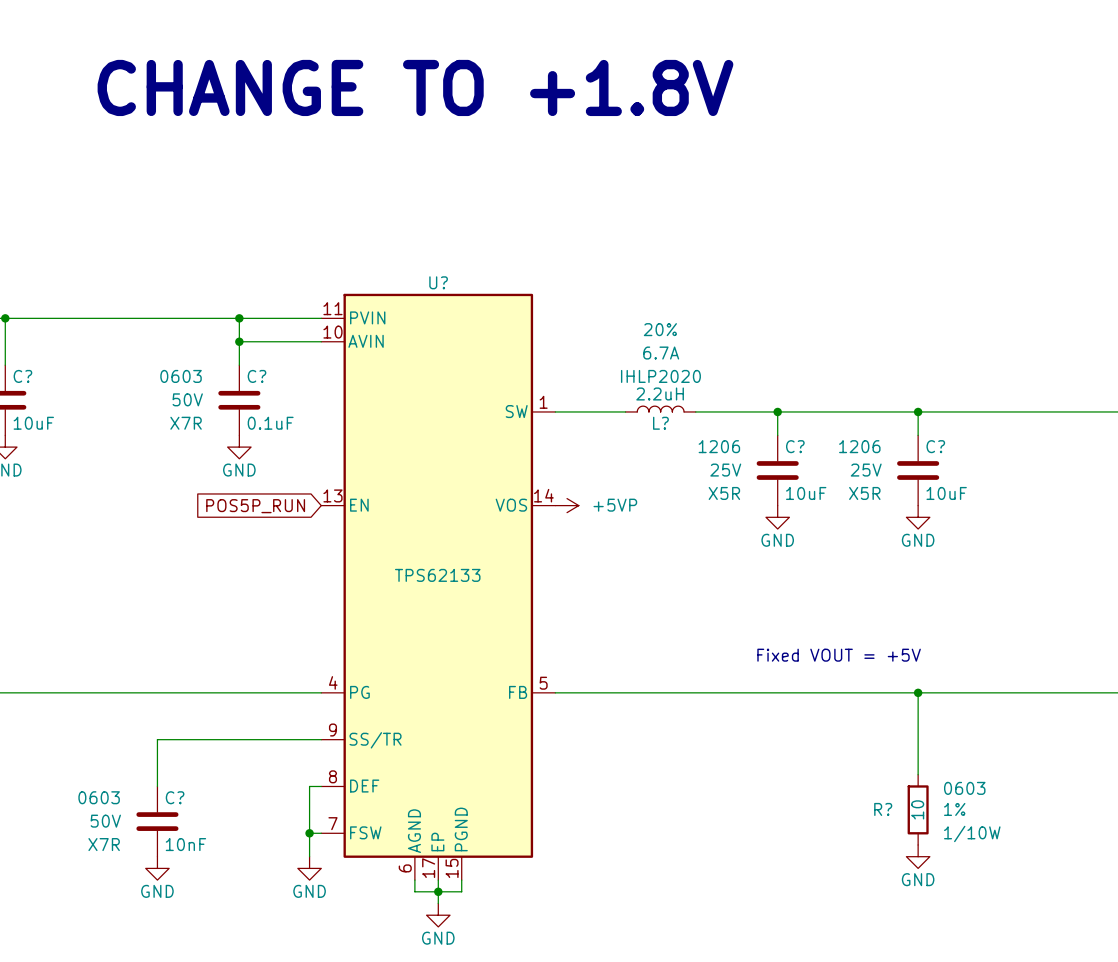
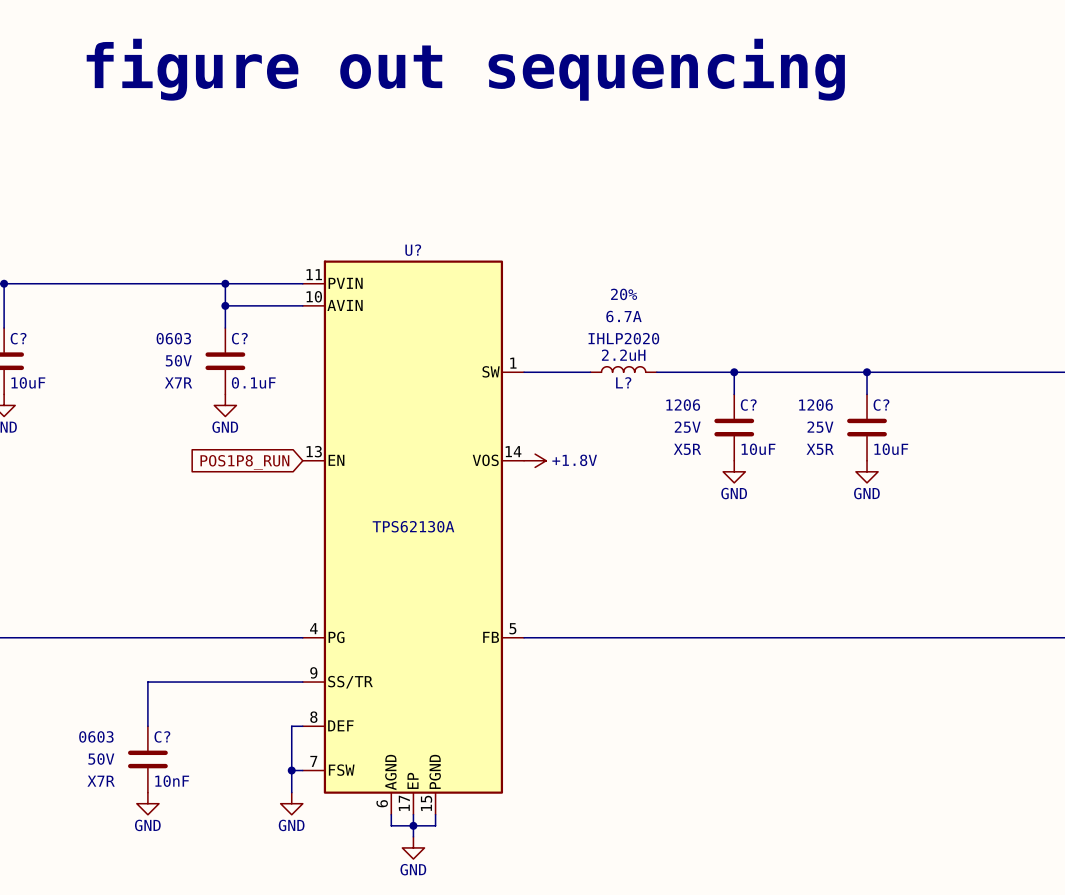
text: CHANGE TO +1.8V (415, 87) -> figure out sequencing (465, 69)
power symbol: +5VP (567, 505) -> +1.8V (535, 460)
global label: POS5P_RUN (255, 506) -> POS1P8_RUN (244, 462)
U? value: TPS62133 (437, 575) -> TPS62130A (413, 526)
text: Fixed VOUT = +5V (839, 655) -> none
wire: (918, 692) (918, 774) -> none
junction: (918, 692) -> none
R?: 10 (918, 809) -> none
power symbol: GND (918, 856) -> none

